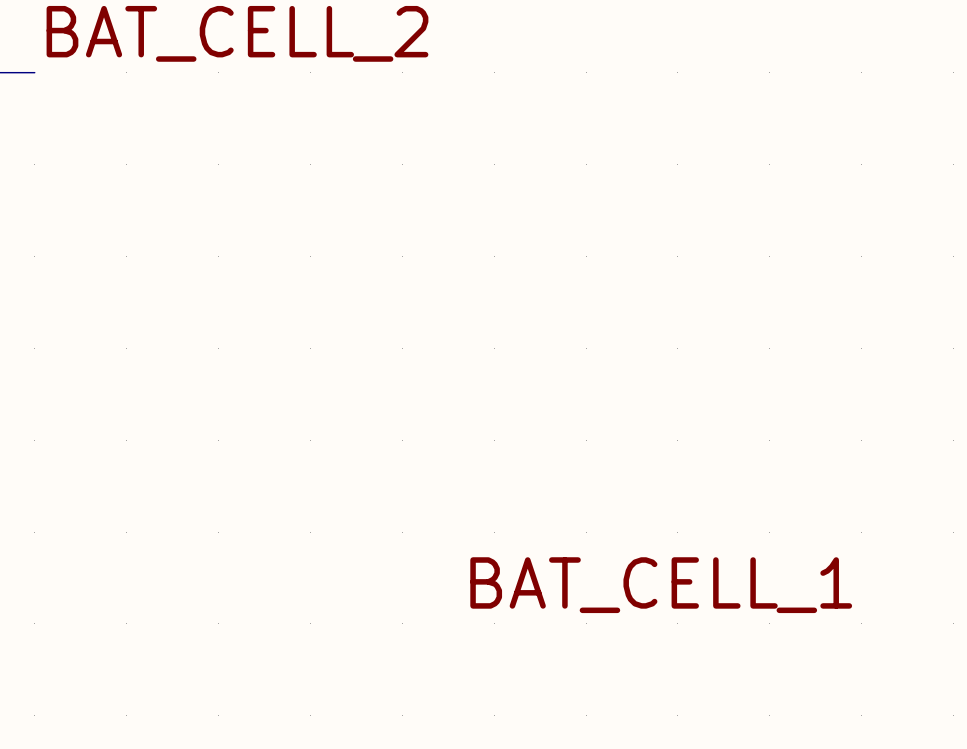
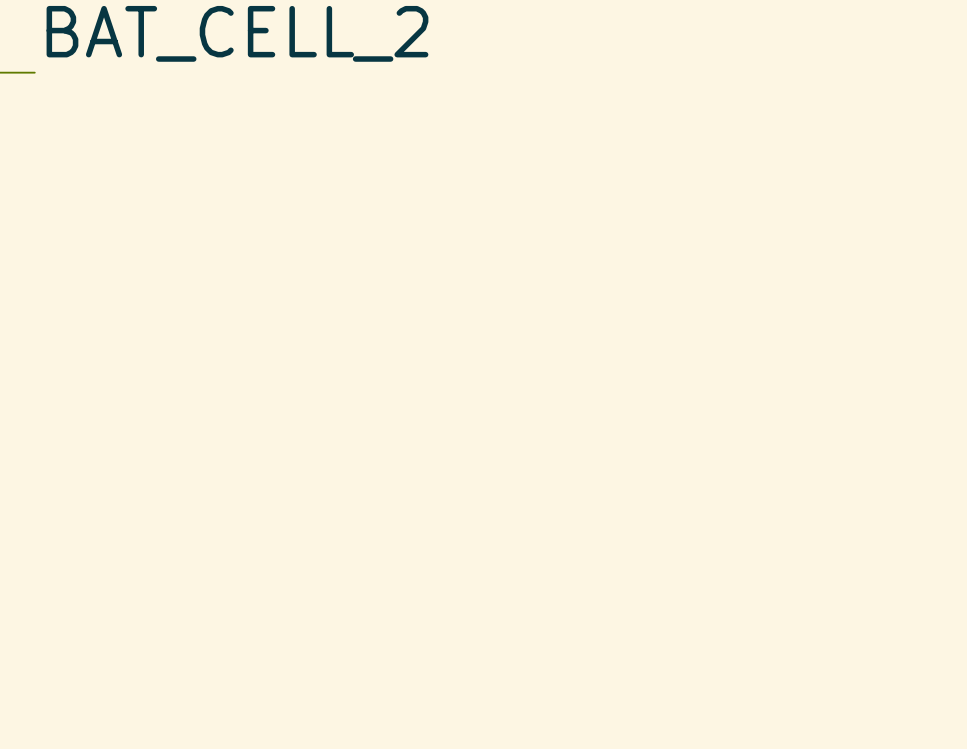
label: BAT_CELL_1 (661, 585) -> none

